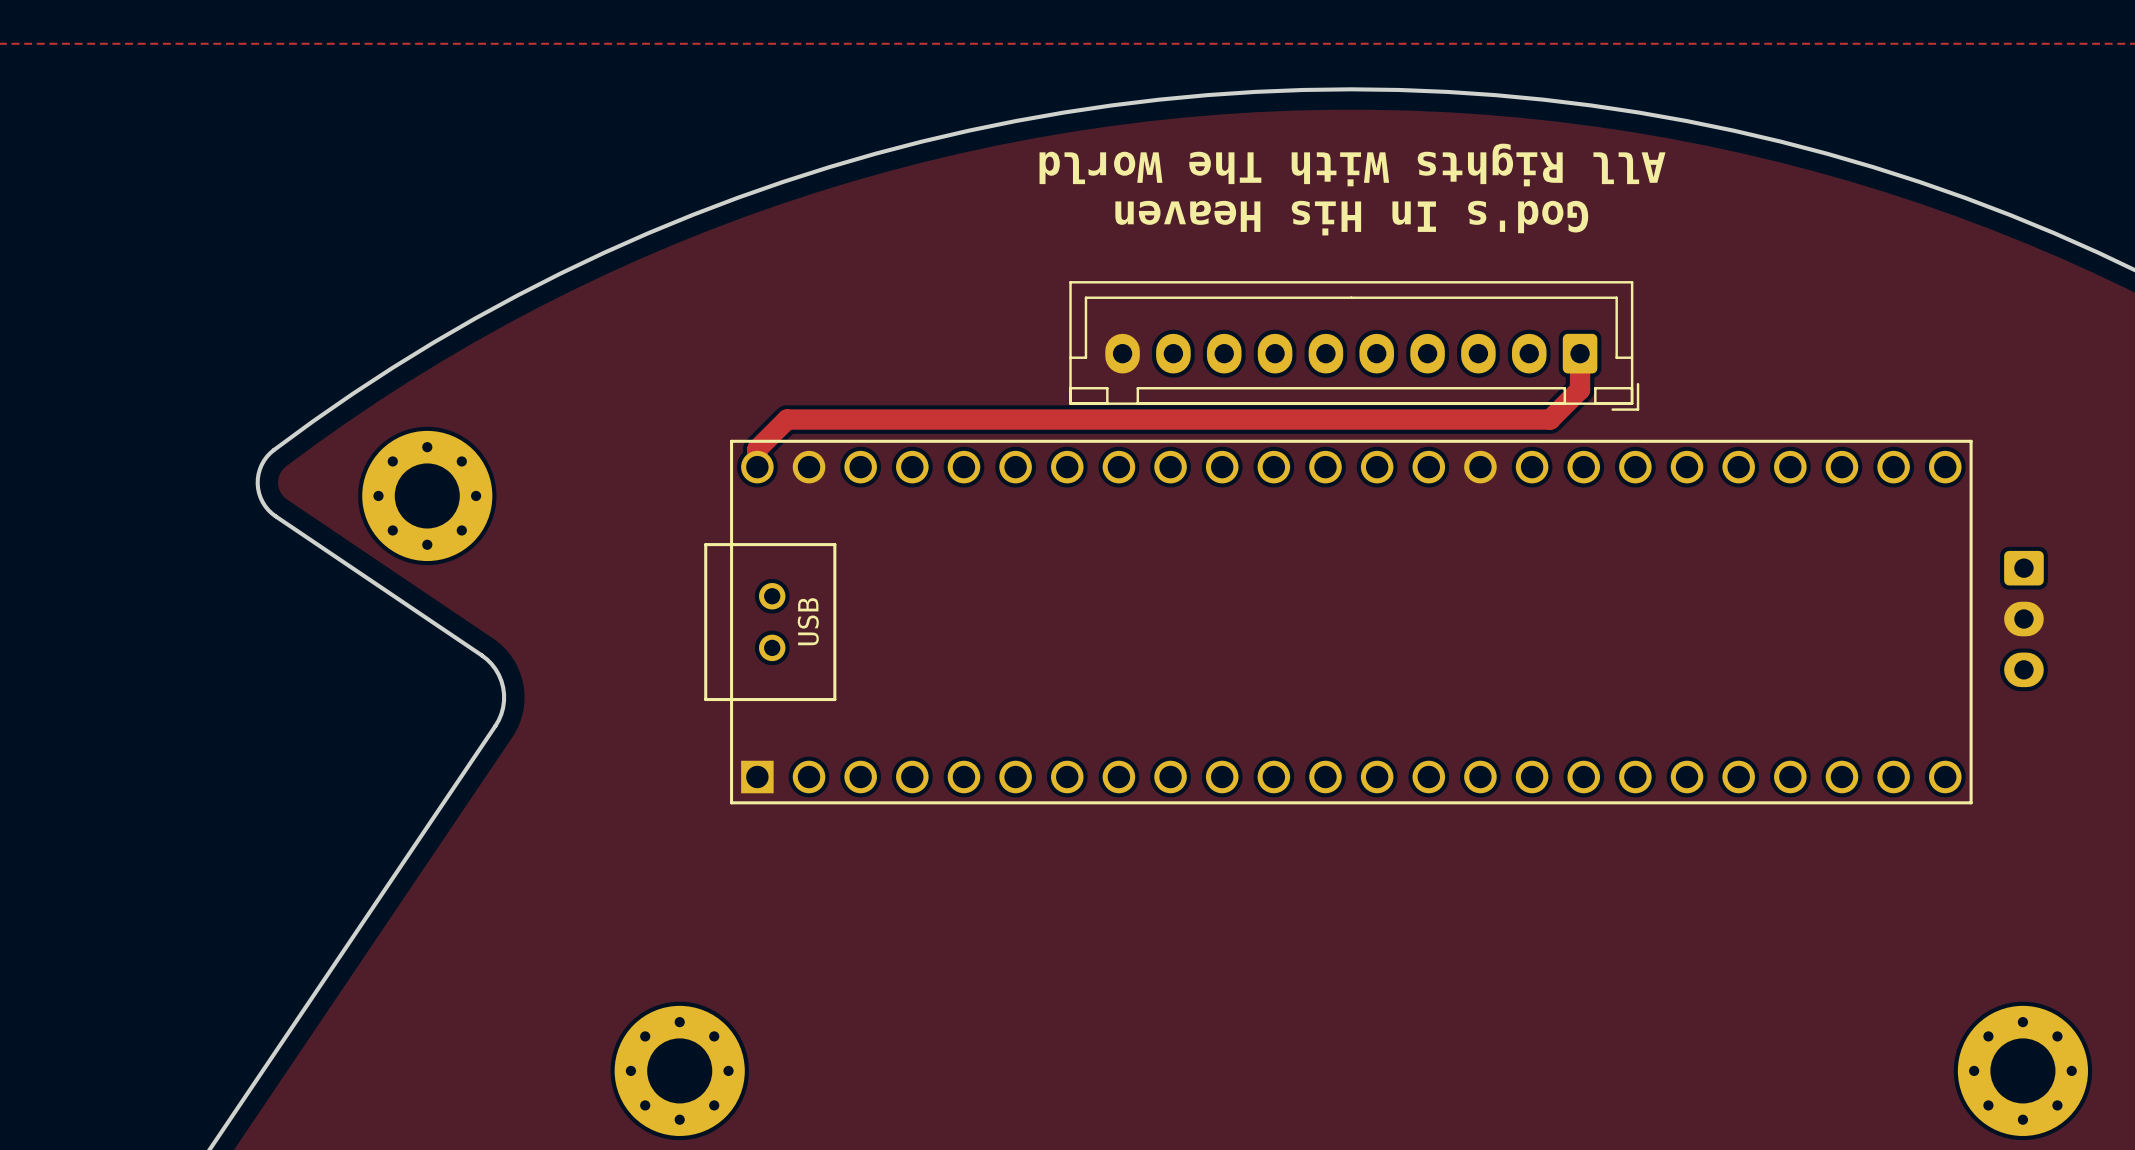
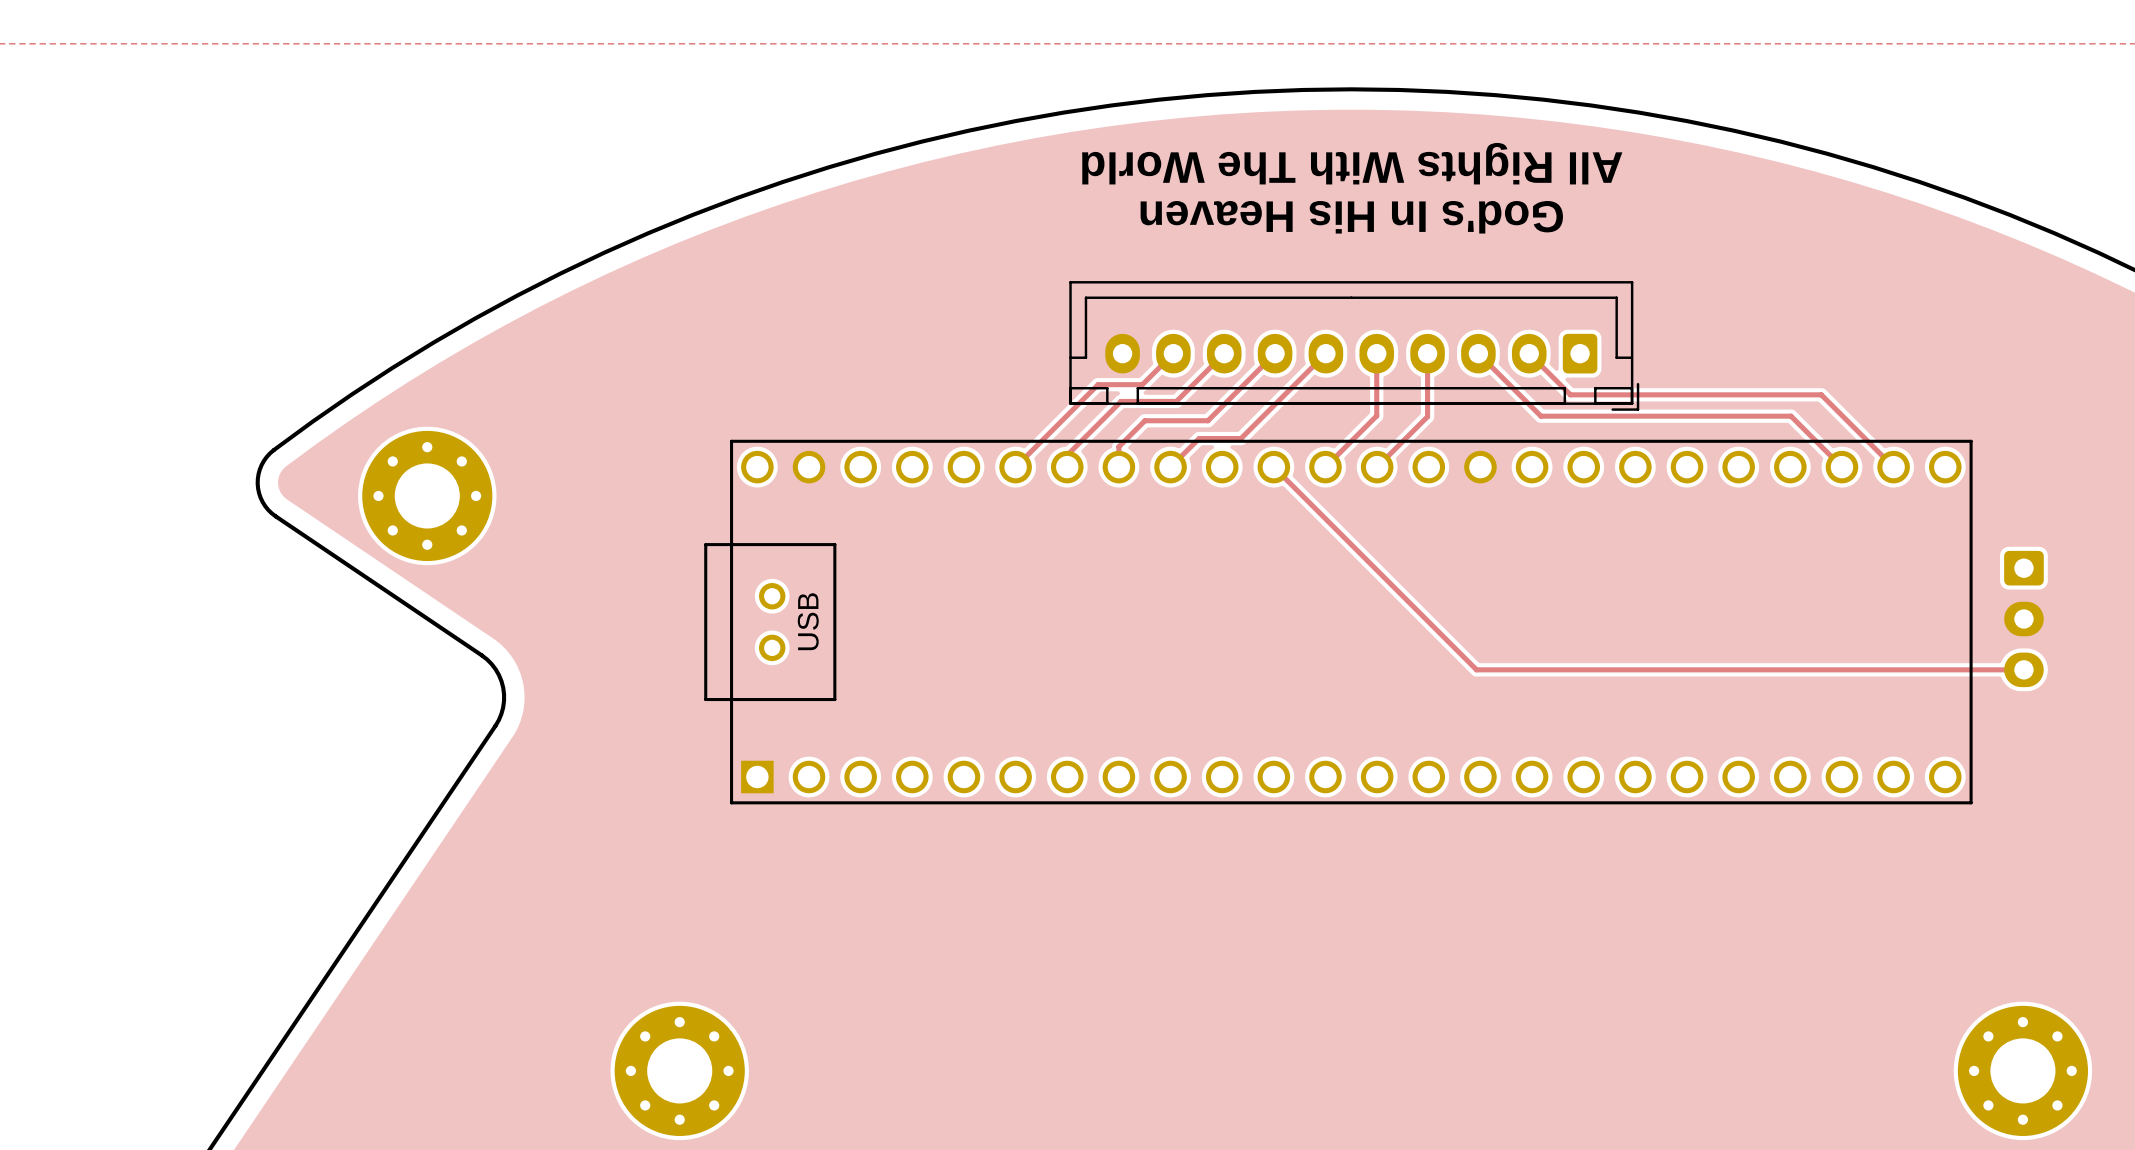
track: none -> (1173, 353) (1142, 384) (1098, 384) (1015, 467)
track: none -> (1224, 353) (1176, 401) (1121, 401) (1067, 455) (1067, 467)
track: none -> (1275, 353) (1207, 420) (1144, 420) (1118, 446) (1118, 467)
track: none -> (1325, 353) (1241, 438) (1199, 438) (1170, 467)
track: none -> (1376, 353) (1376, 415) (1325, 467)
track: none -> (1427, 353) (1427, 416) (1377, 467)
track: none -> (1478, 353) (1540, 416) (1791, 416) (1841, 467)
track: none -> (1529, 353) (1570, 394) (1821, 394) (1893, 467)
track: (1580, 353) (1580, 389) (1550, 419) (787, 419) (757, 449) (757, 467) -> none
track: none -> (1273, 467) (1476, 669) (2023, 669)

